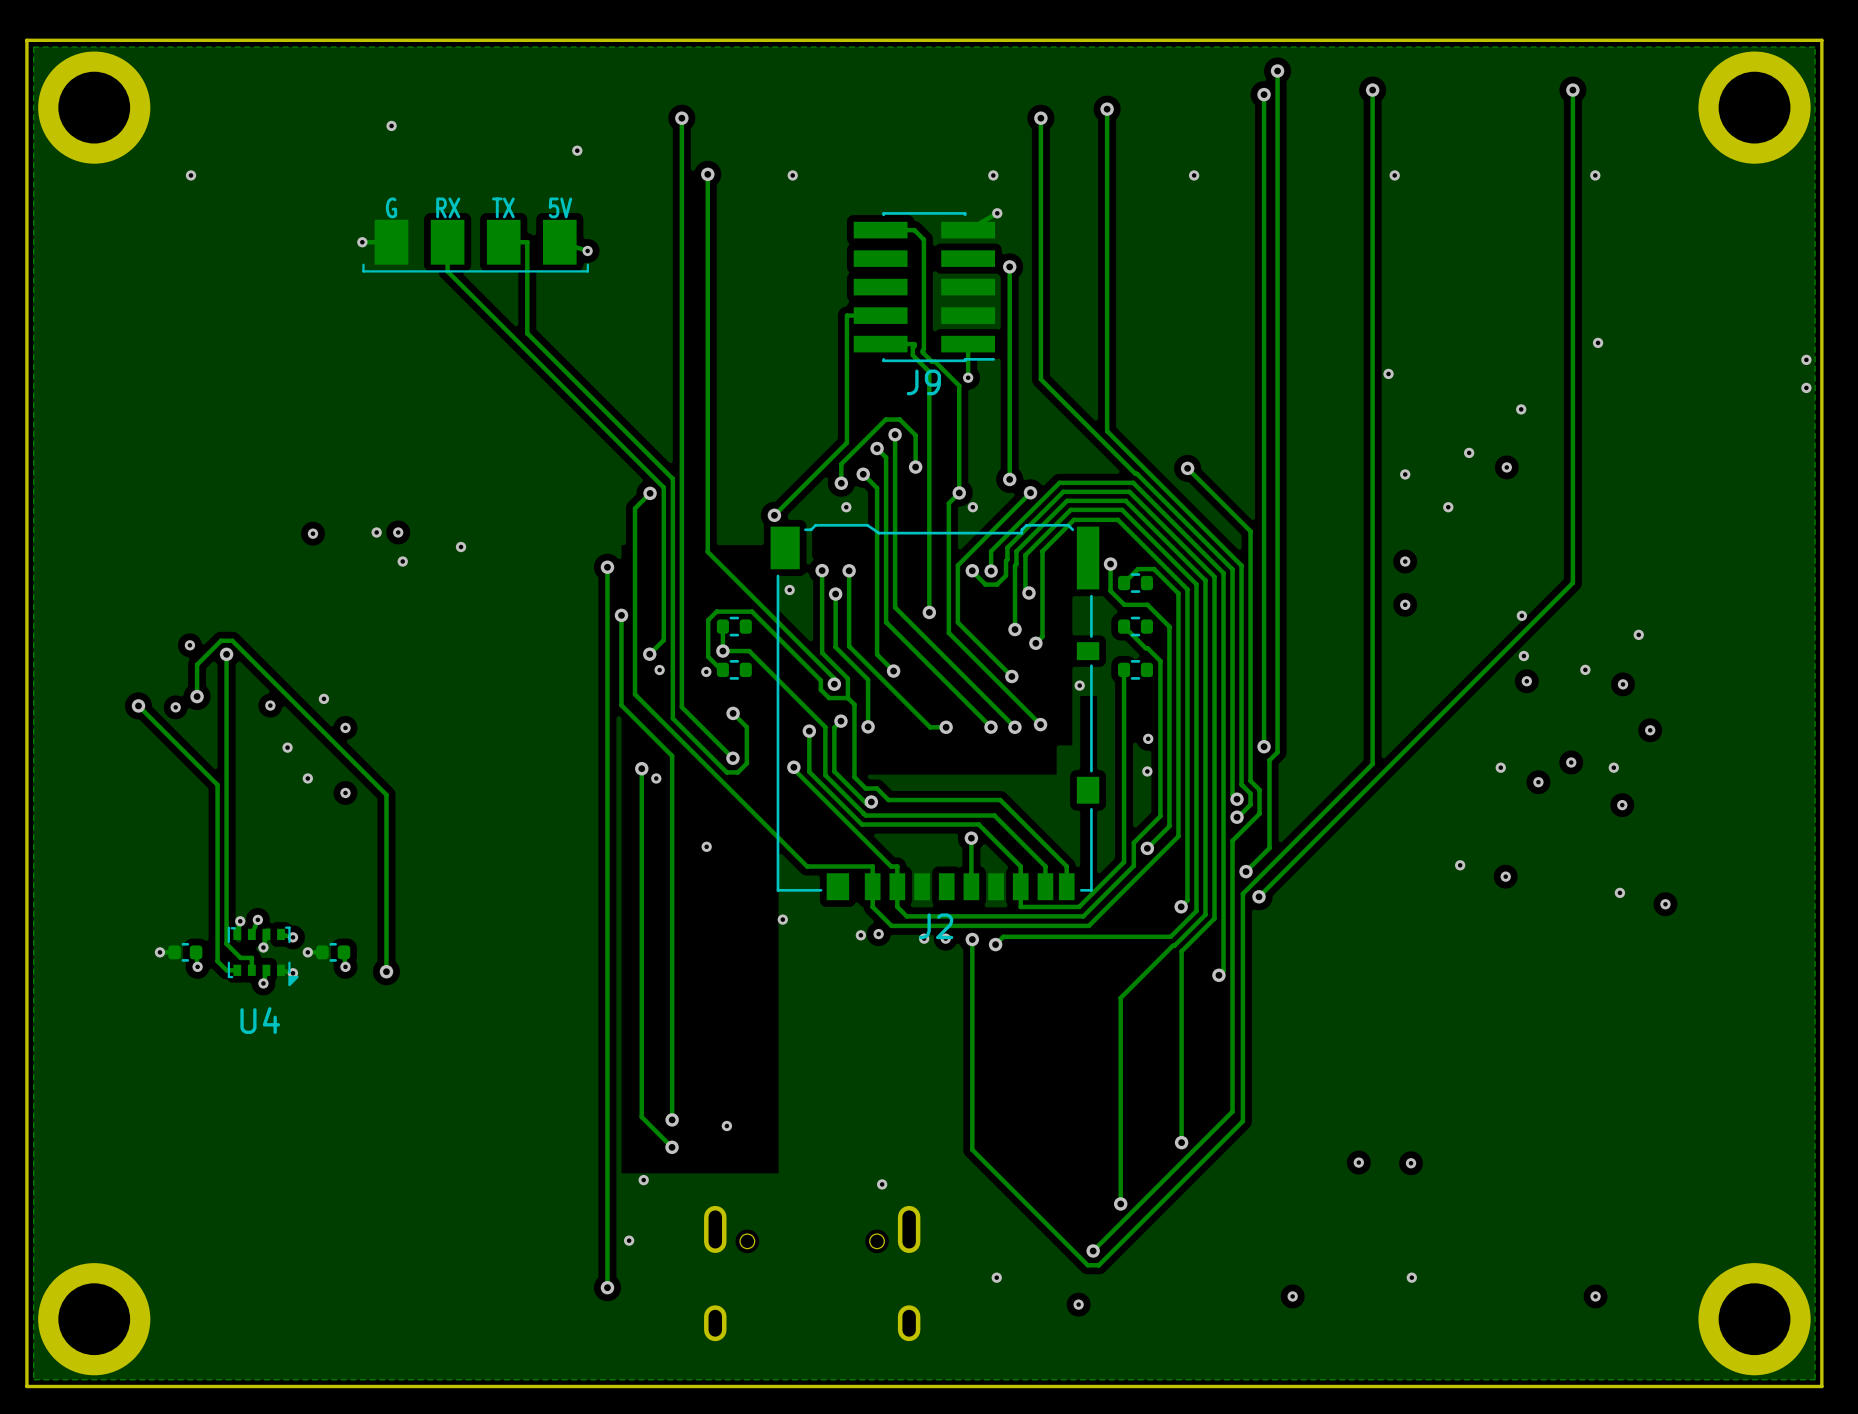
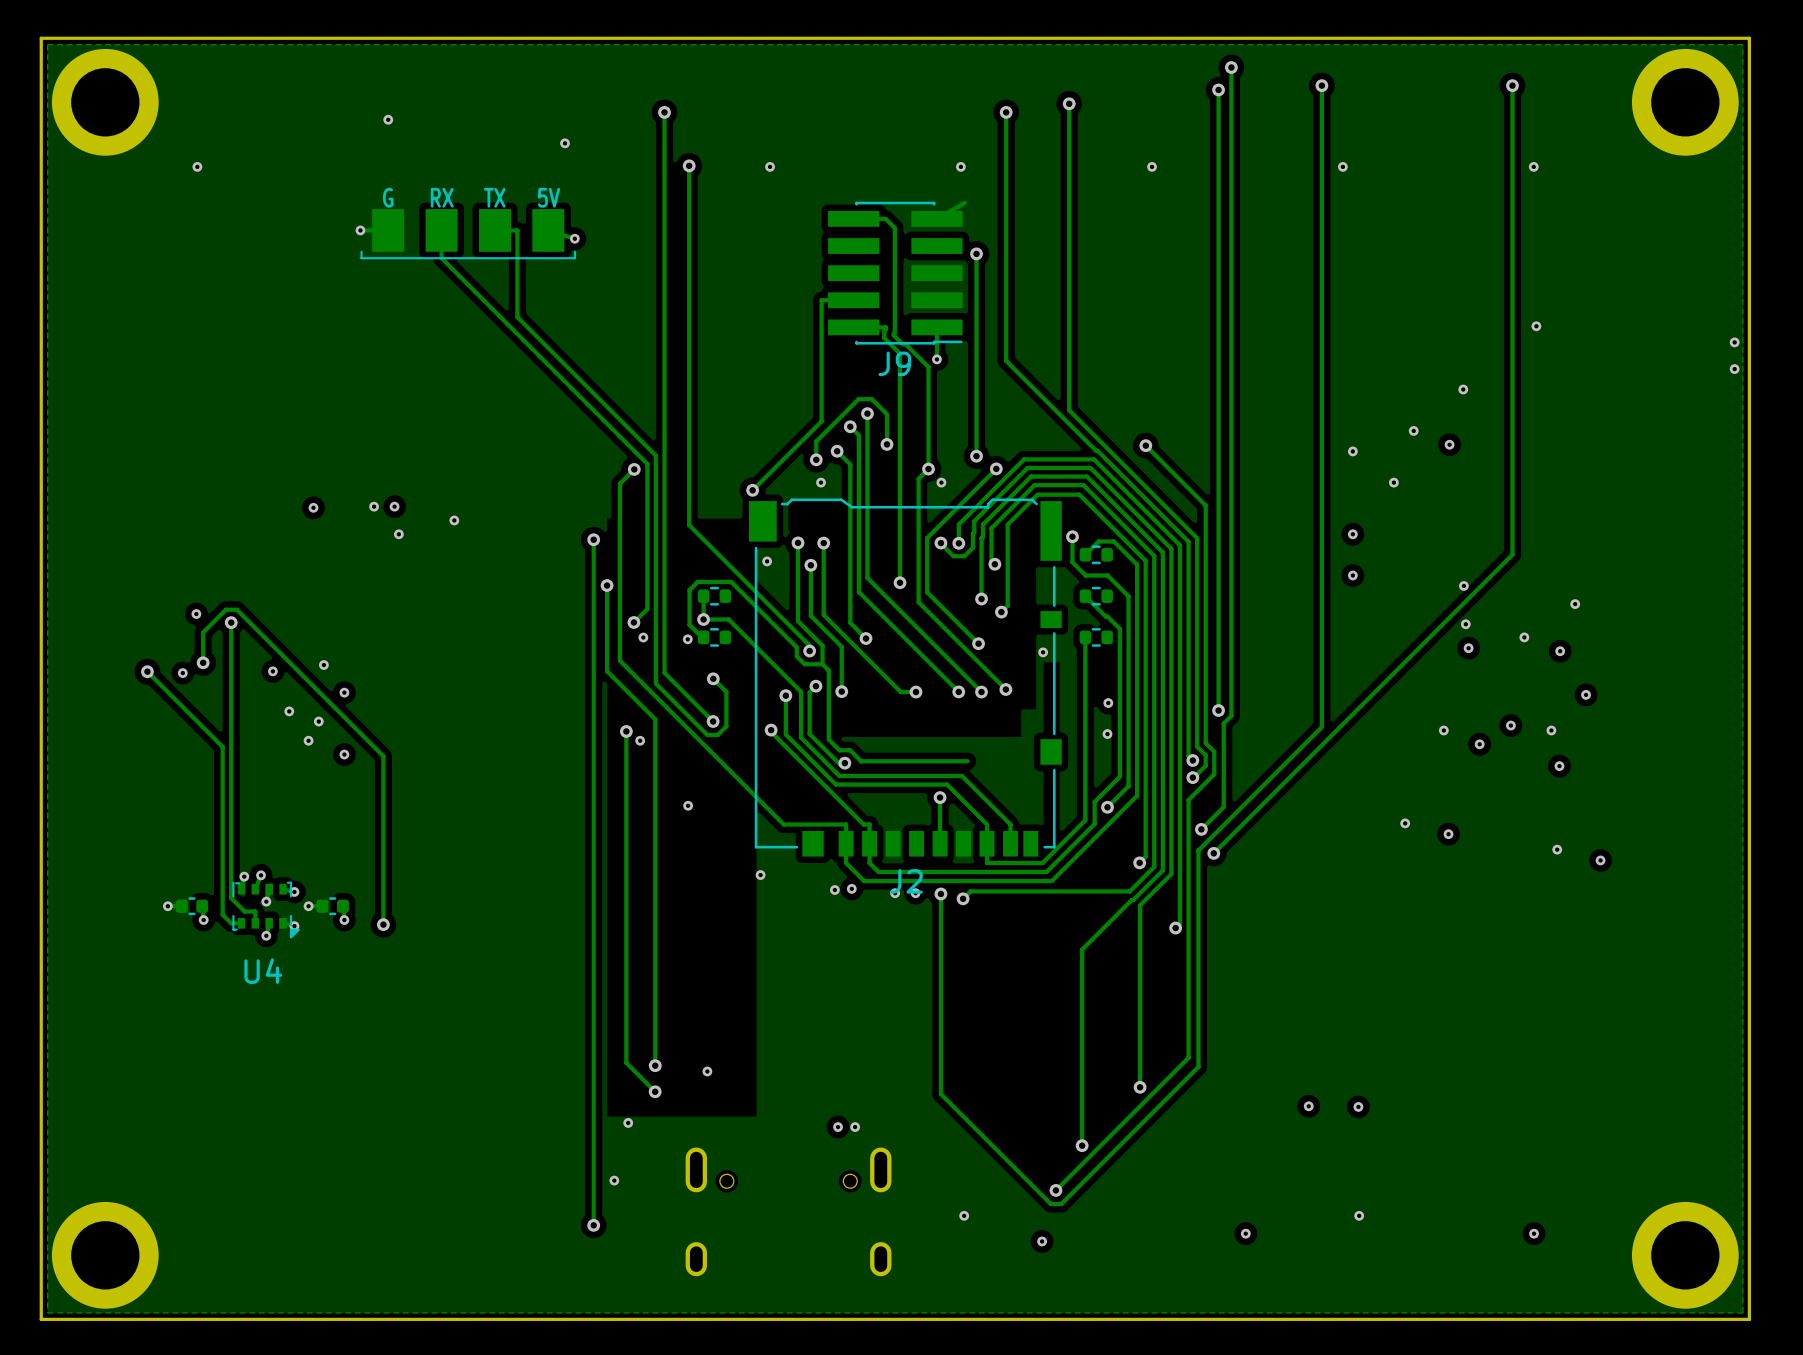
via: (997, 213) -> none
via: (1388, 373) -> none
via: none -> (318, 721)
track: (1000, 800) (1066, 866) (1066, 886) -> none
via: none -> (838, 1127)

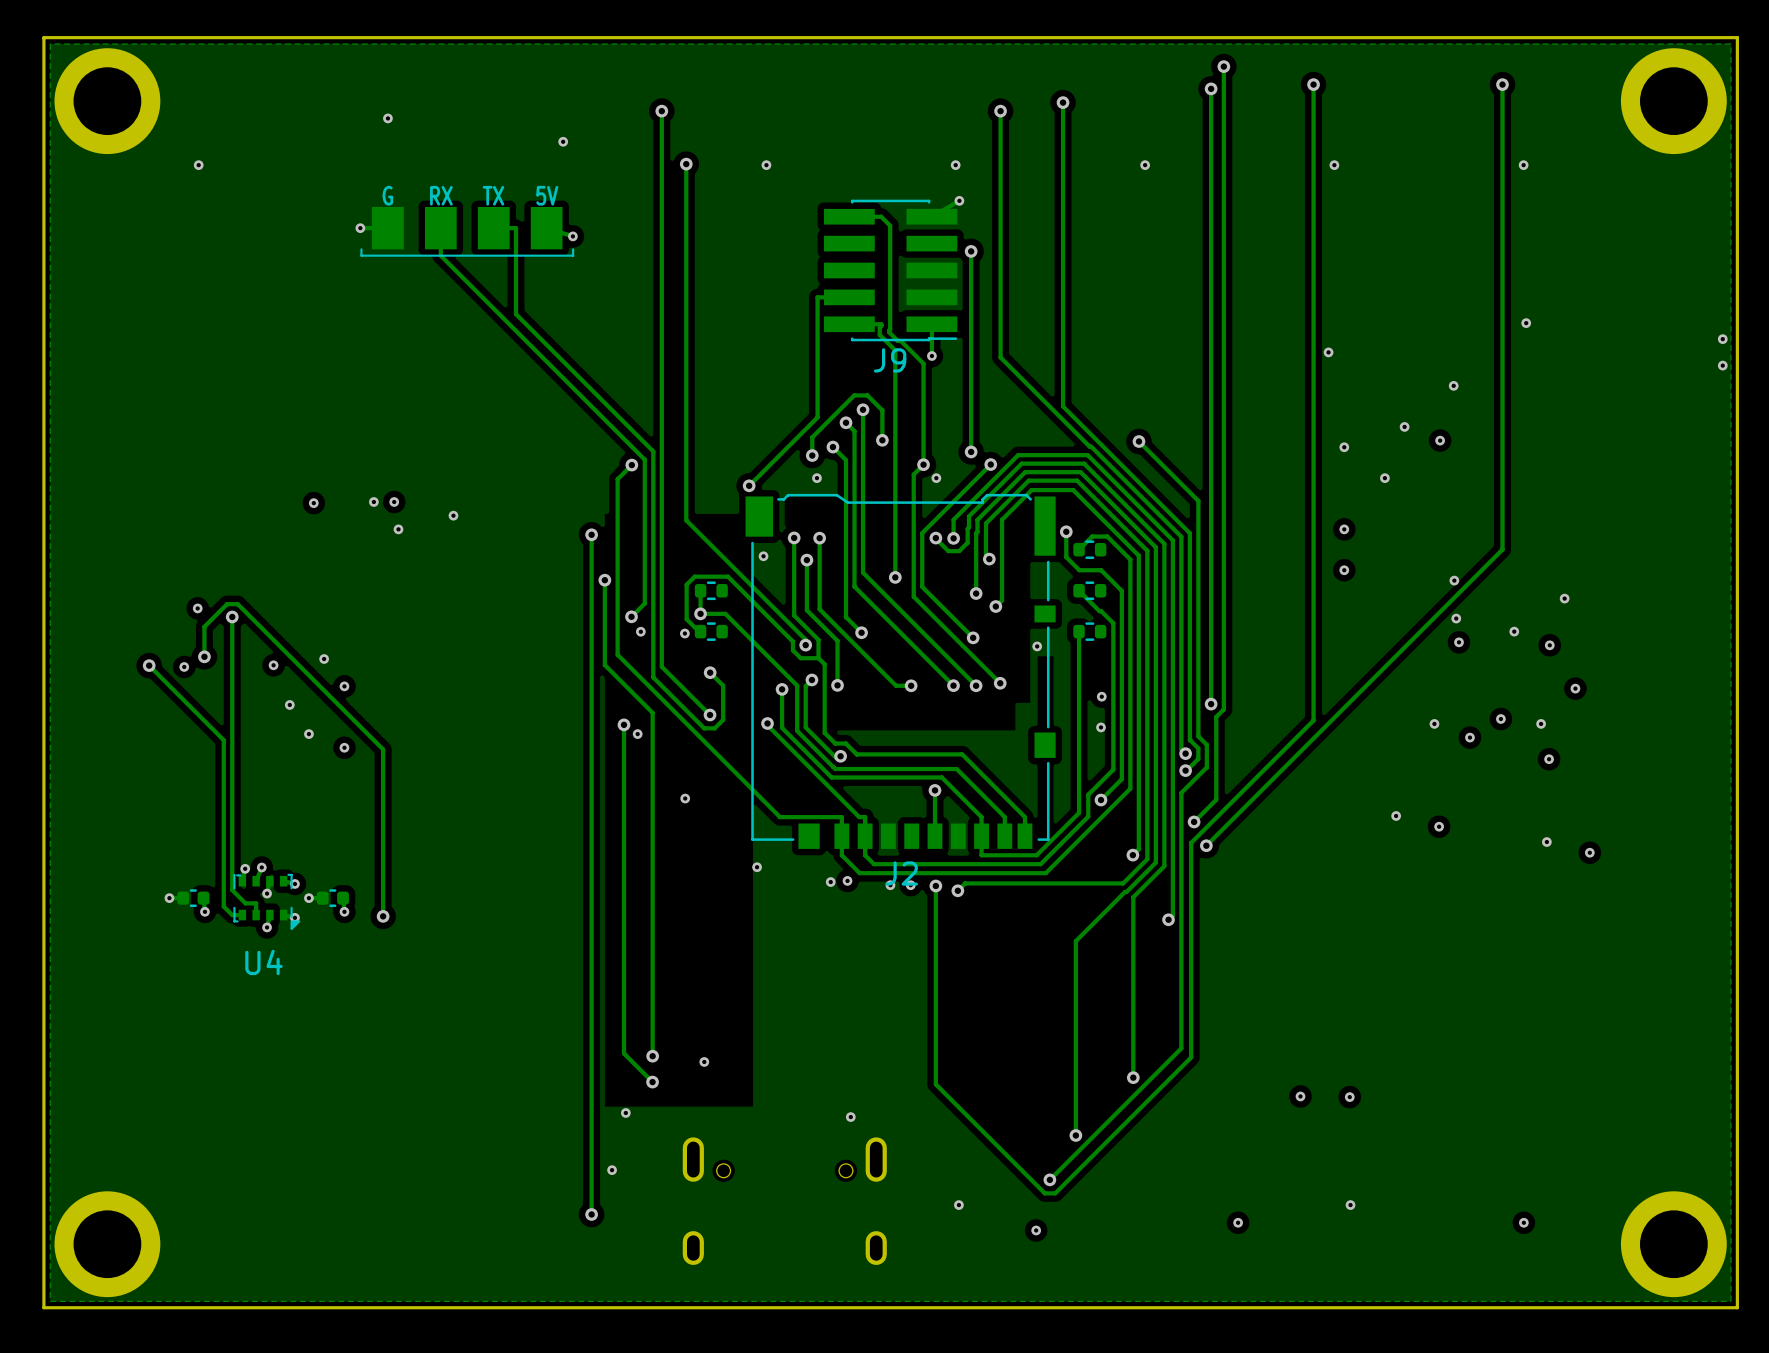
via: none -> (959, 200)
via: none -> (1328, 352)
via: (318, 721) -> none
track: none -> (962, 754) (1024, 817) (1024, 836)
via: (838, 1127) -> none

